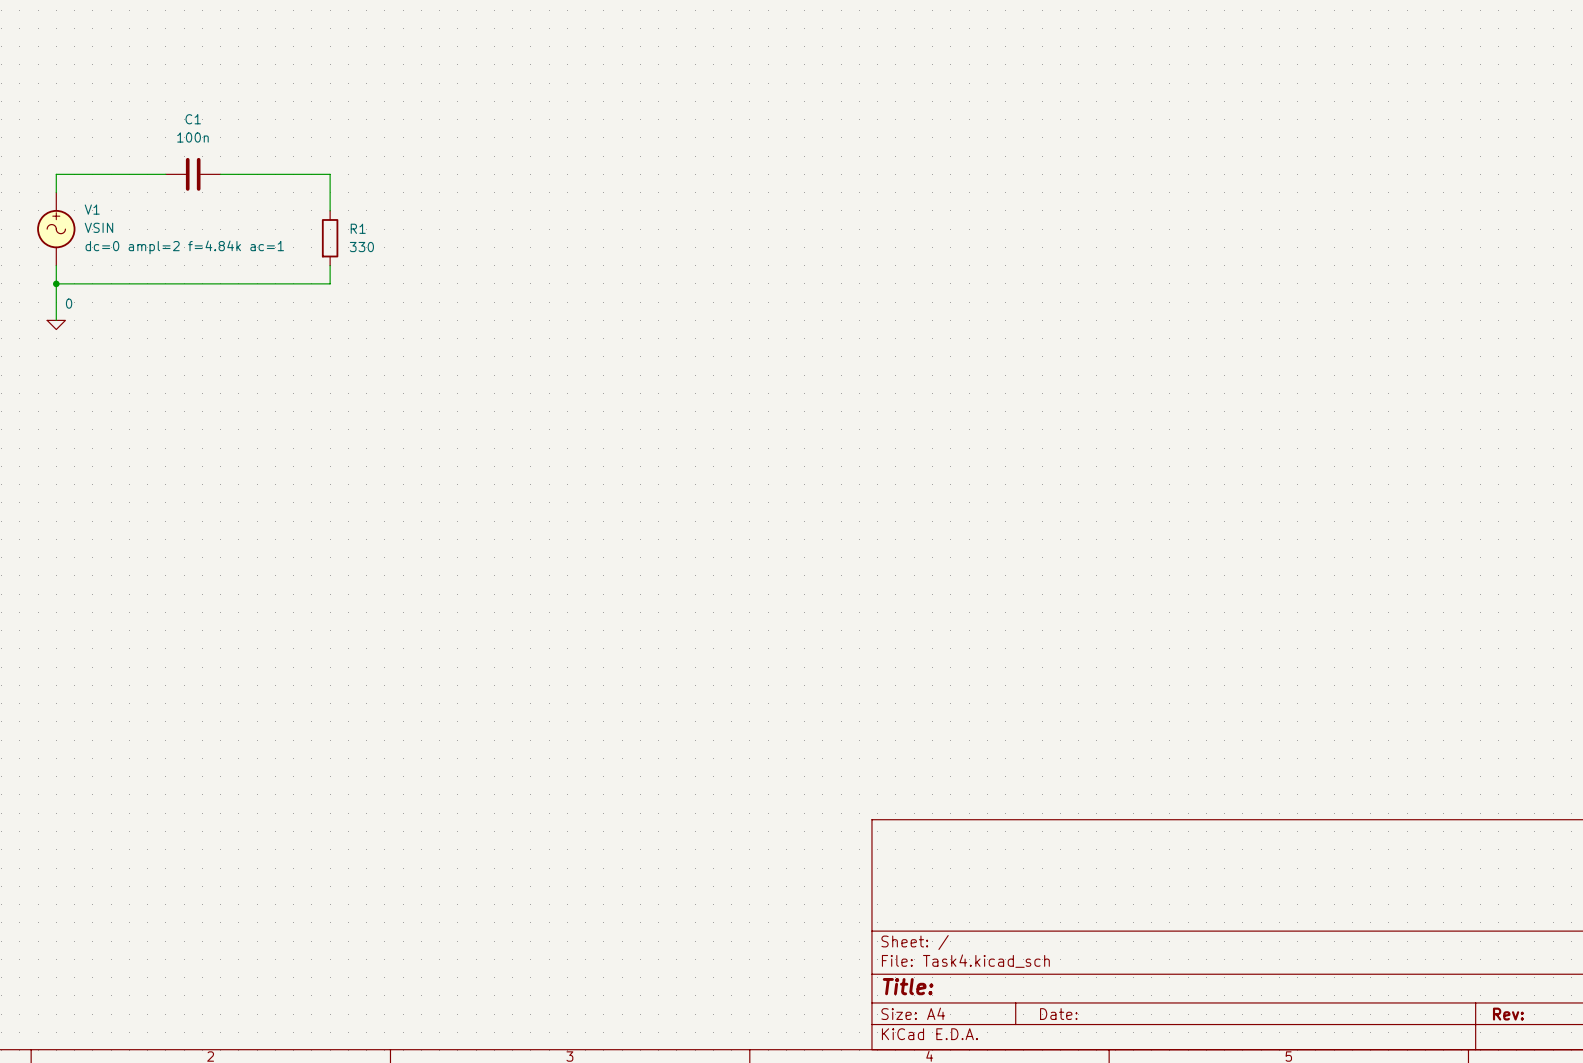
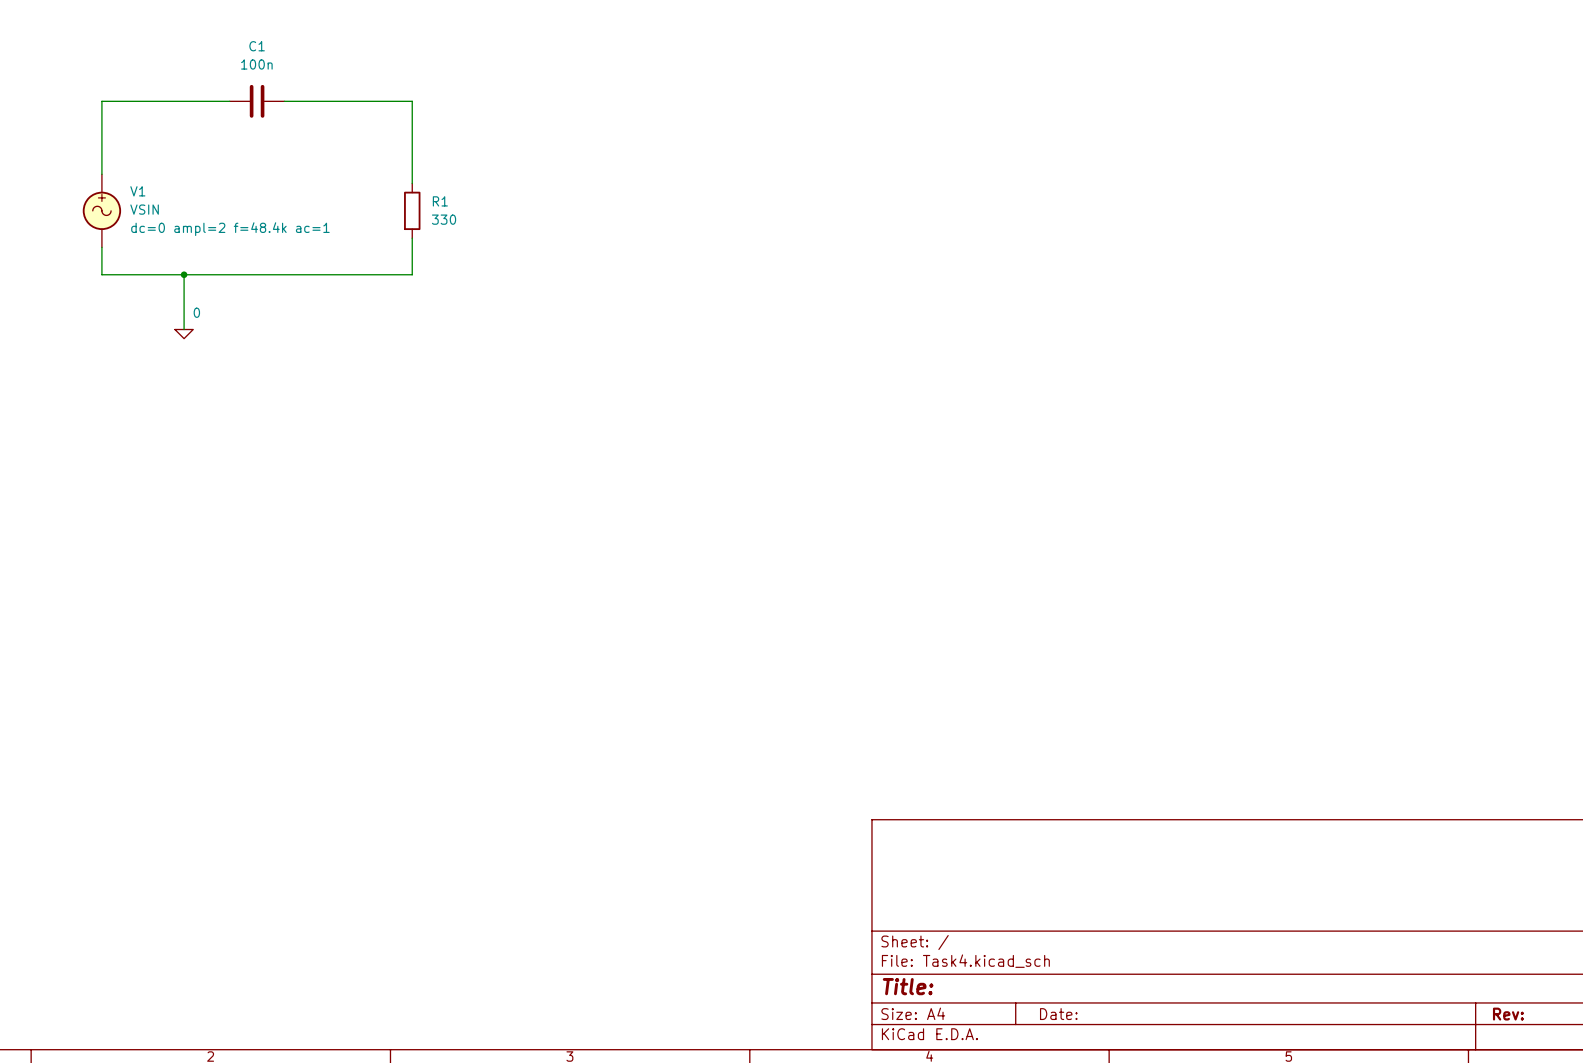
wire: none -> (229, 101) (101, 101) (101, 174)
wire: none -> (284, 101) (412, 101) (412, 183)
wire: (165, 174) (56, 174) (56, 192) -> none
C1 position: (193, 174) -> (257, 101)
wire: (220, 174) (330, 174) (330, 210) -> none
V1 position: (56, 229) -> (101, 210)
R1 position: (330, 238) -> (412, 210)
wire: none -> (412, 238) (412, 274) (101, 274) (101, 247)
V1 text: dc=0 ampl=2 f=4.84k ac=1 (184, 247) -> dc=0 ampl=2 f=48.4k ac=1 (230, 229)
wire: (56, 265) (56, 320) -> (184, 274) (184, 329)
wire: (330, 265) (330, 283) (56, 283) -> none
junction: none -> (184, 274)
junction: (56, 283) -> none
power symbol position: 0 (56, 324) -> 0 (184, 334)

